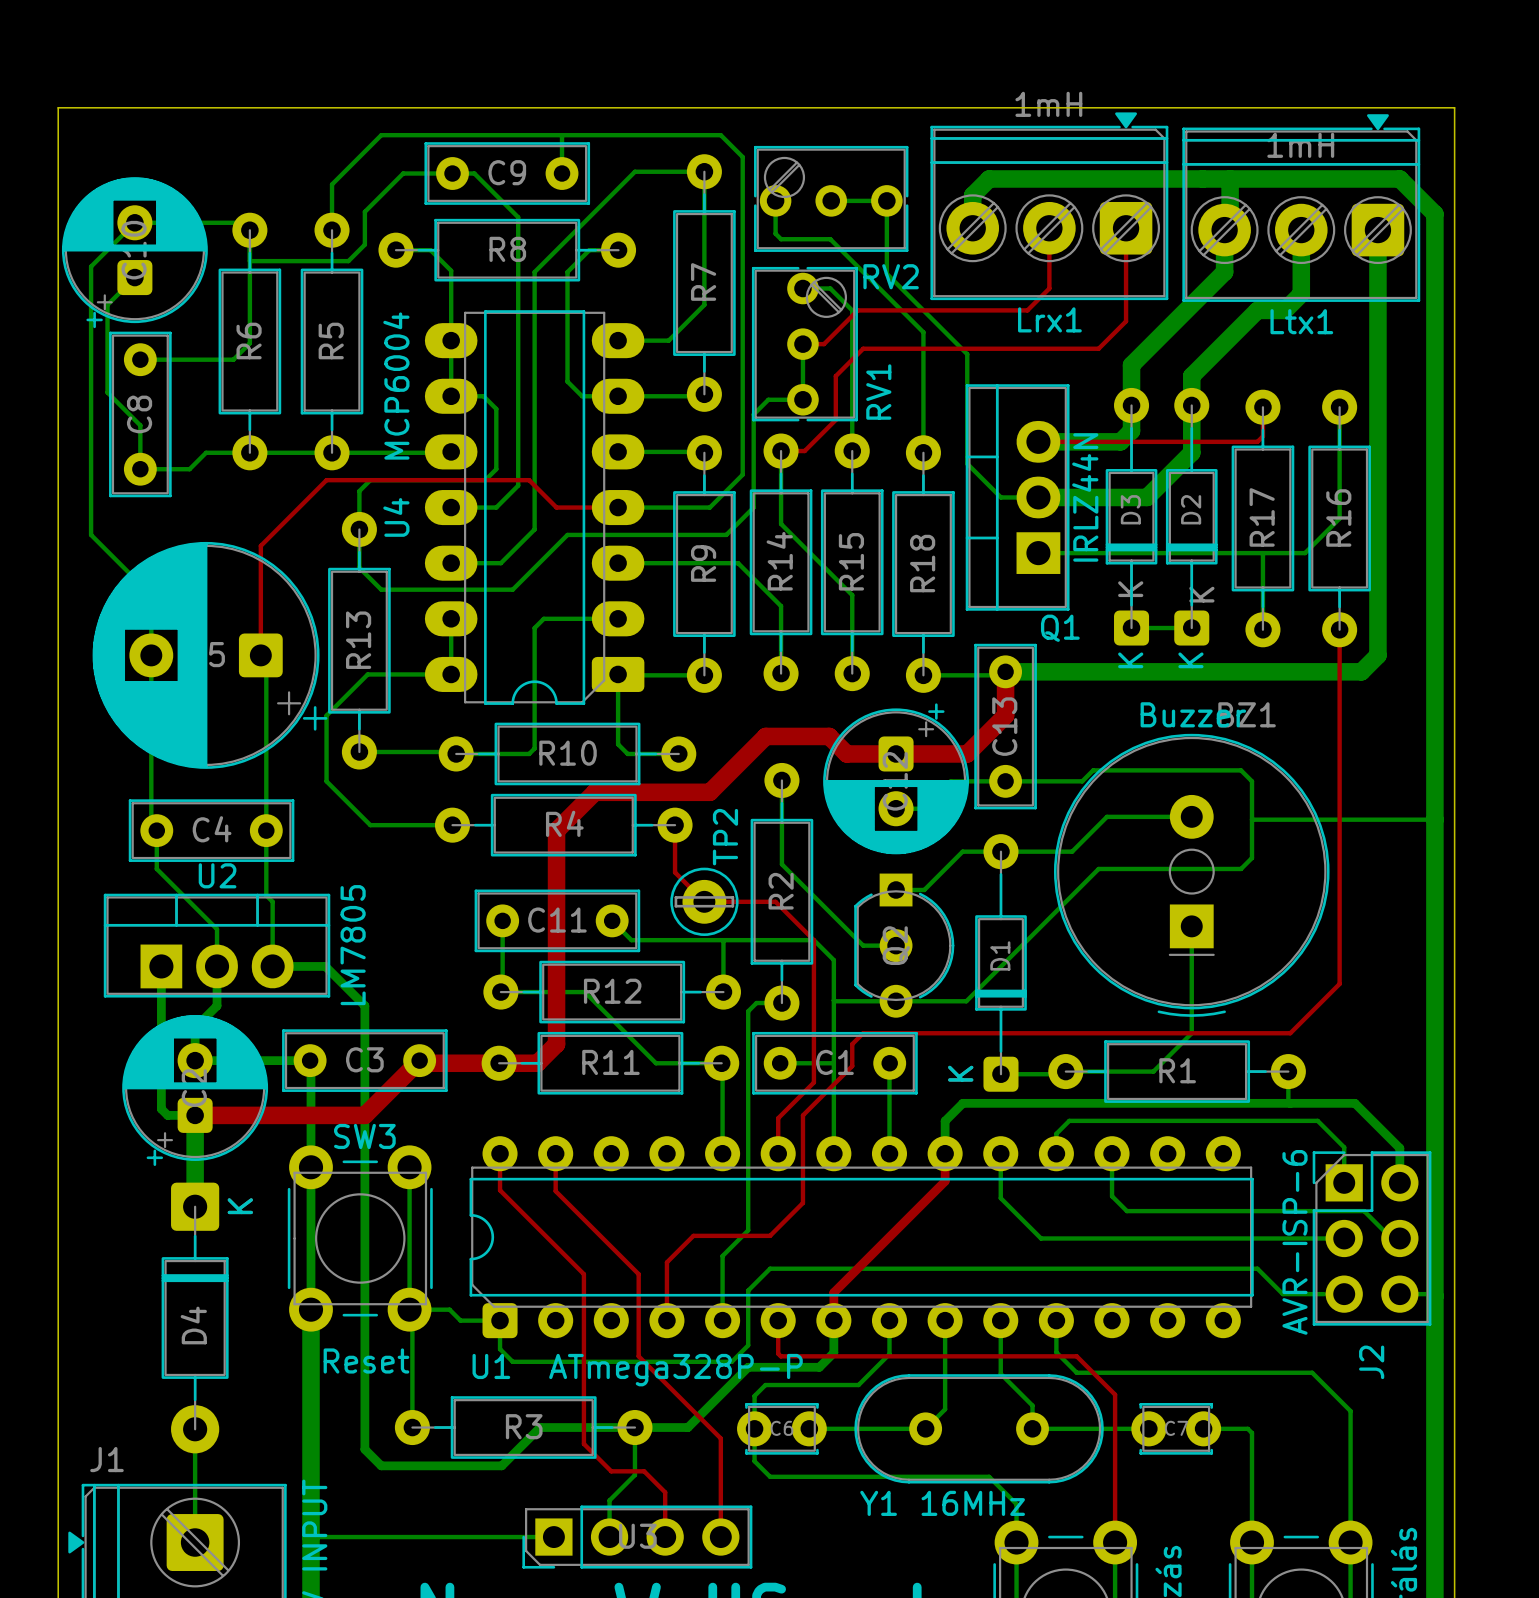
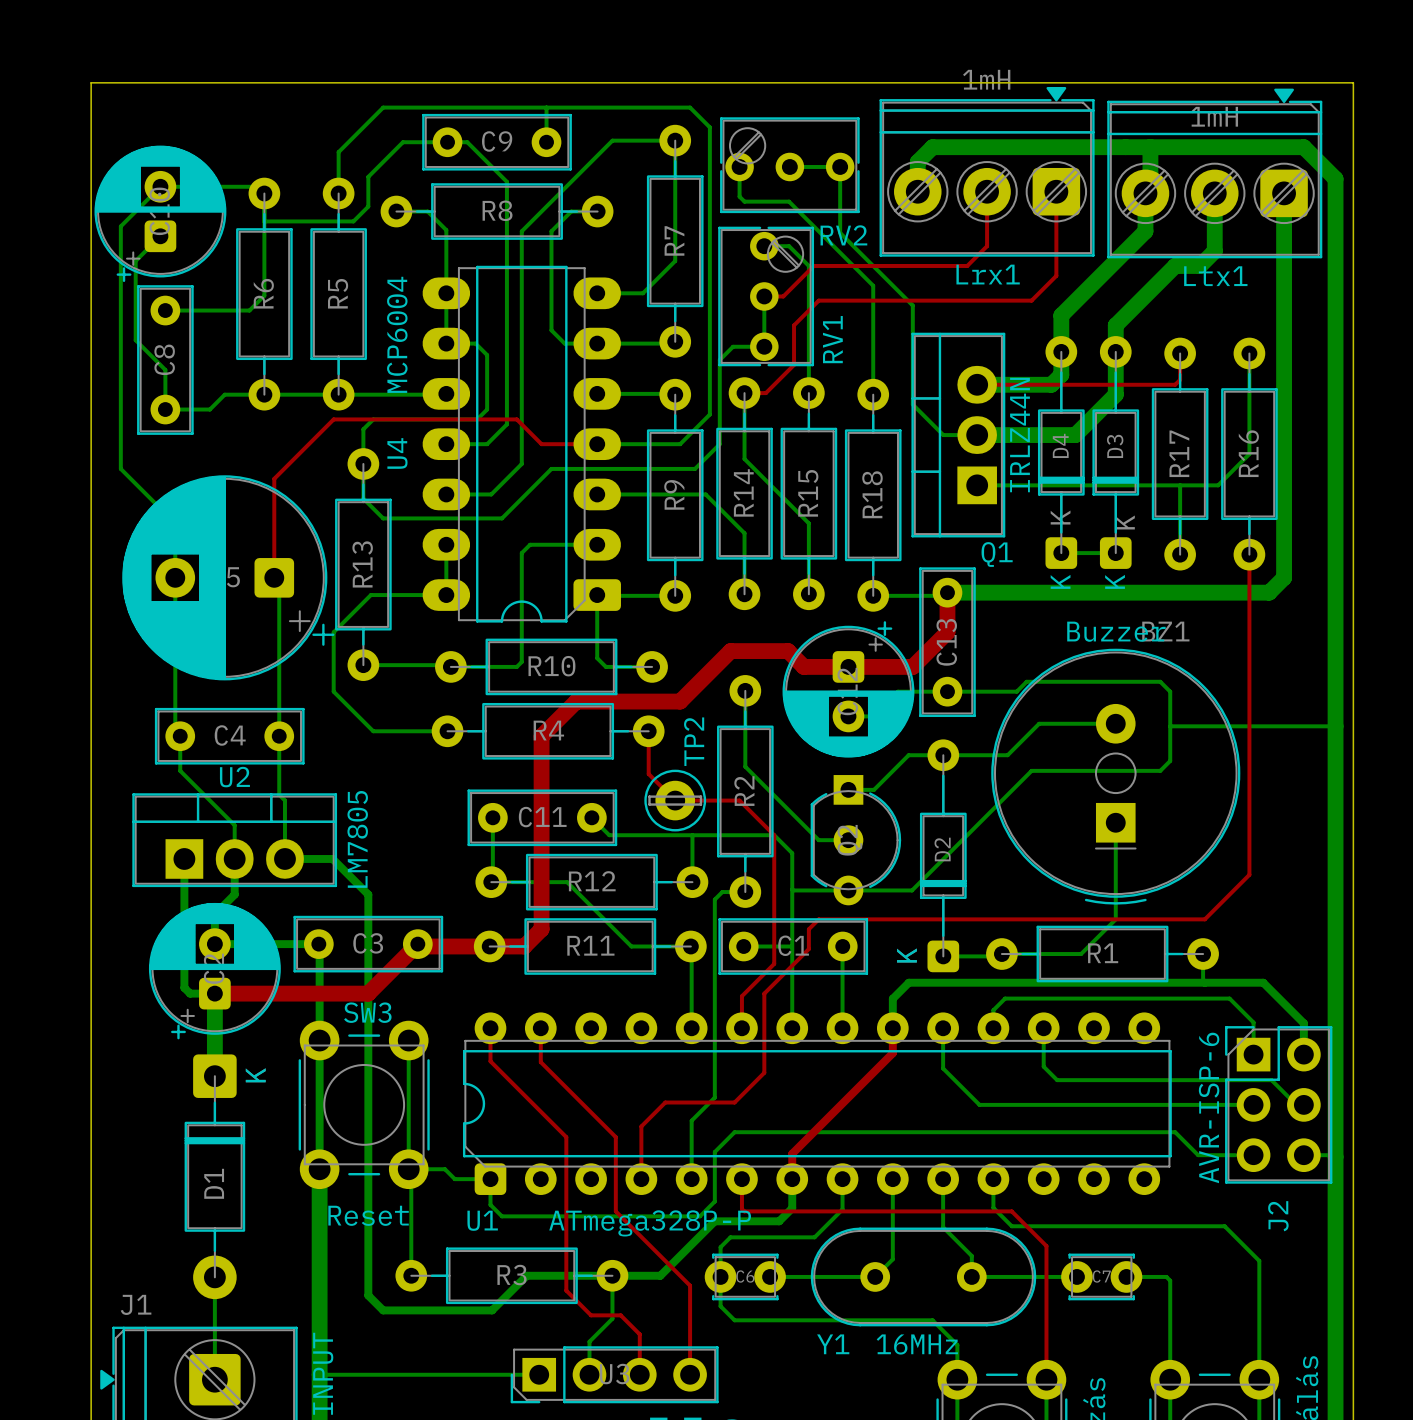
D3 name: D3 (1130, 509) -> D4 (1060, 445)
D2 name: D2 (1191, 509) -> D3 (1115, 446)
D1 name: D1 (1000, 955) -> D2 (942, 849)
D4 name: D4 (193, 1325) -> D1 (214, 1183)

